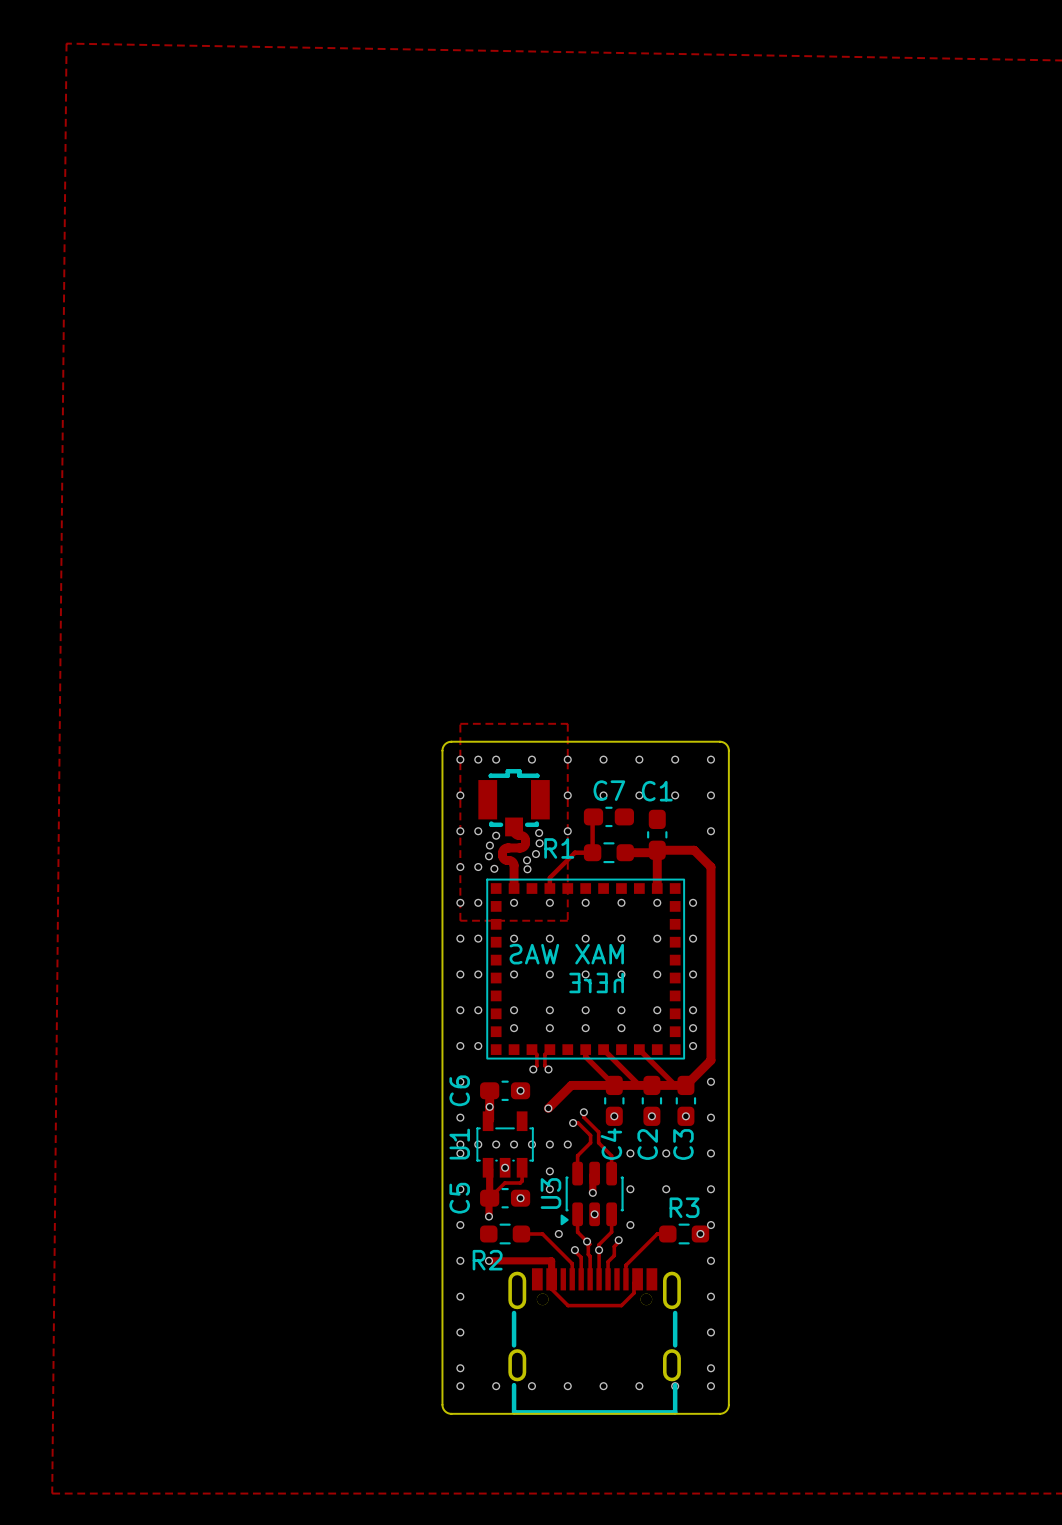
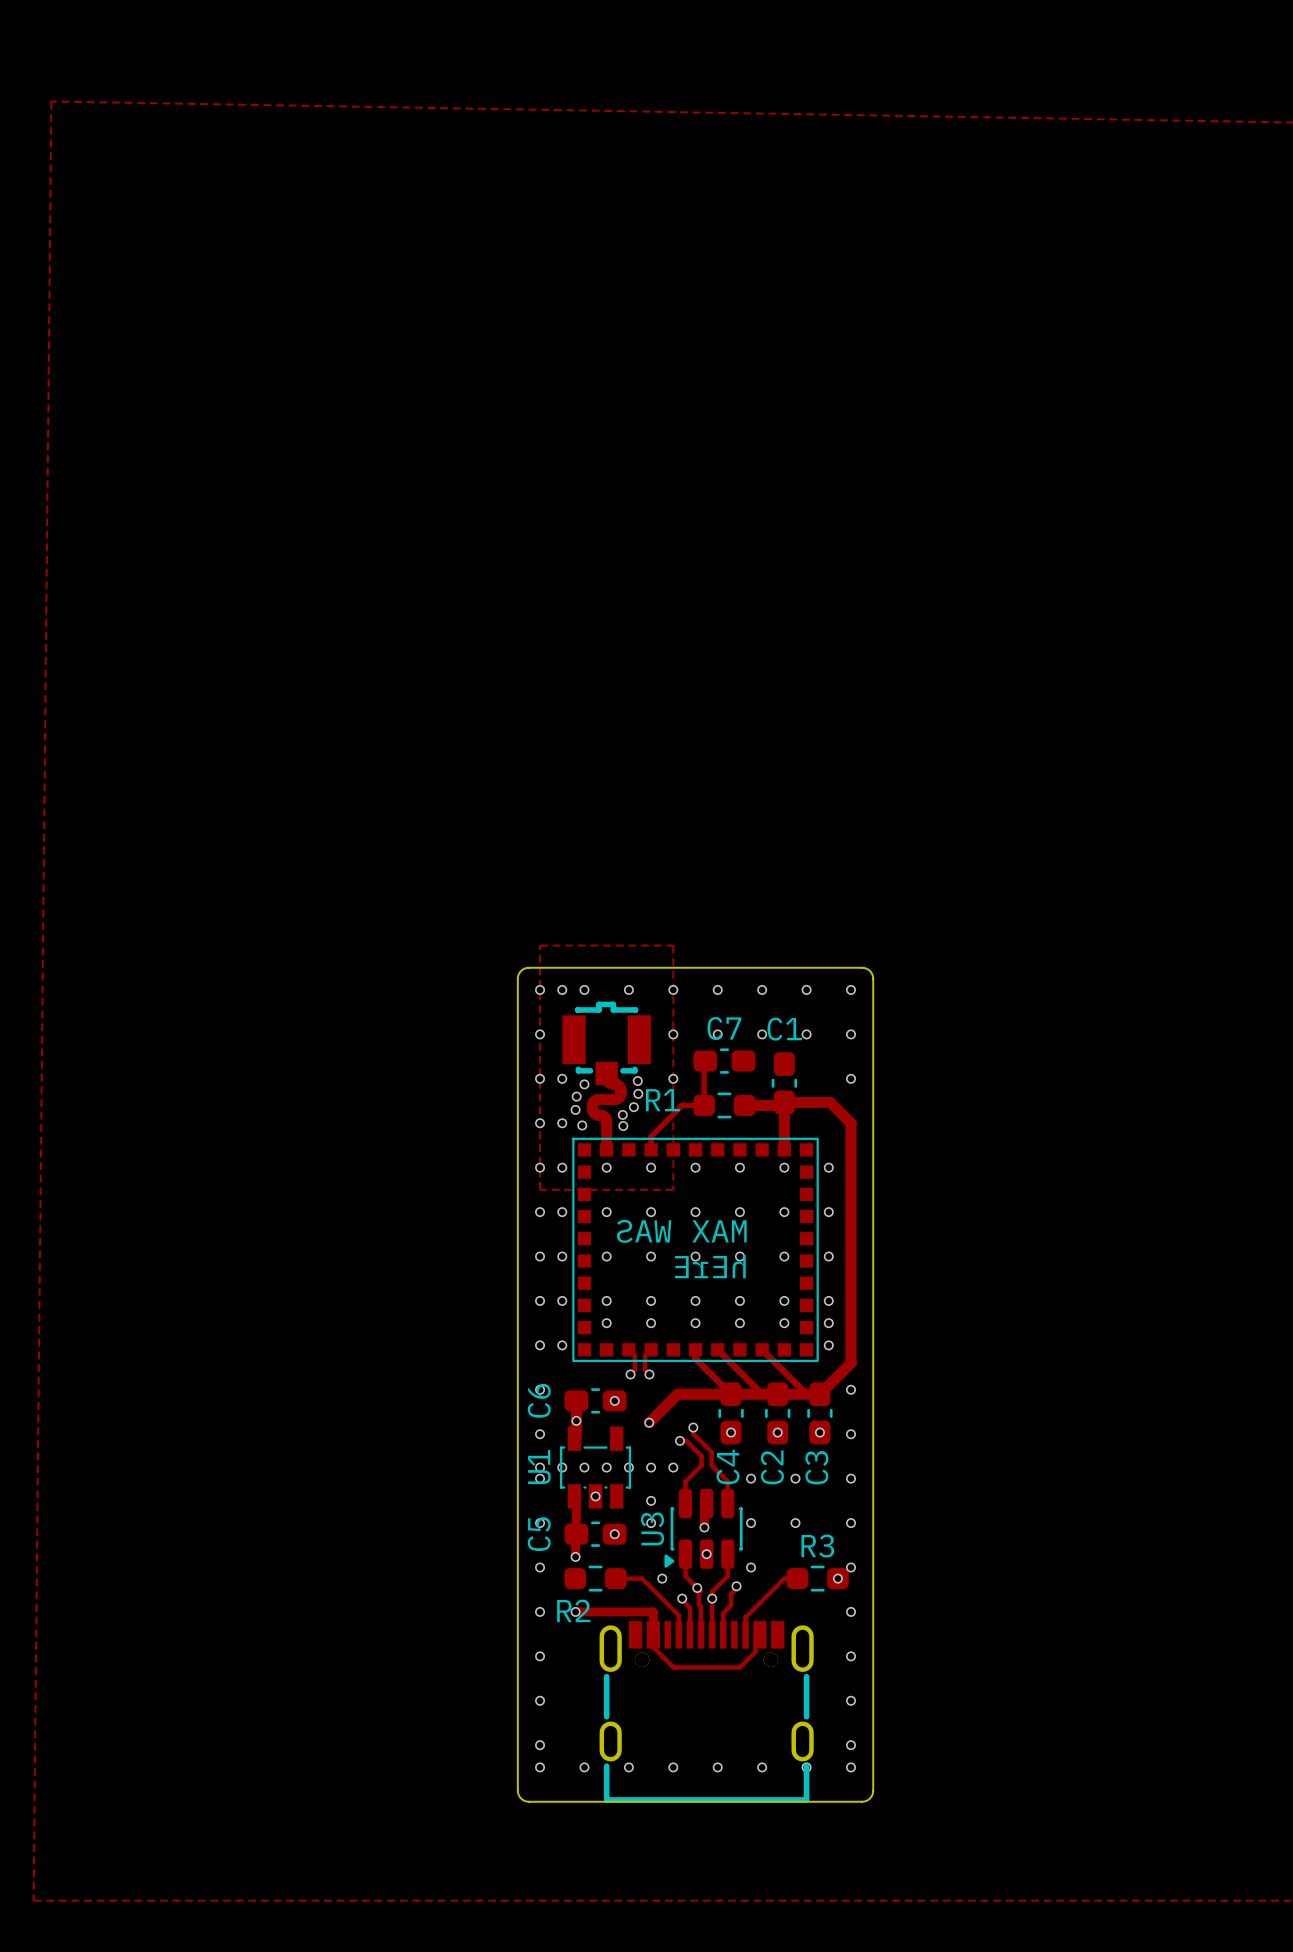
track: (522, 1167) (522, 1181) (520, 1183) (504, 1183) (489, 1198) -> none

